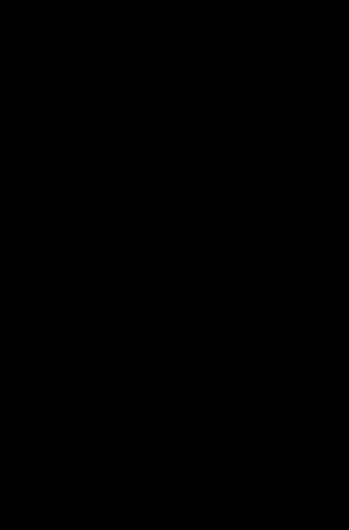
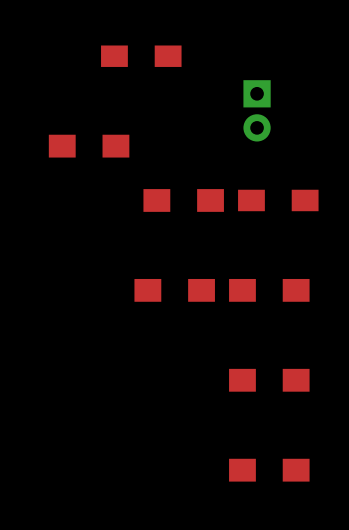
part: none -> (141, 56)
part: none -> (257, 110)
part: none -> (89, 146)
part: none -> (183, 200)
part: none -> (278, 200)
part: none -> (174, 290)
part: none -> (269, 290)
part: none -> (269, 380)
part: none -> (269, 470)

